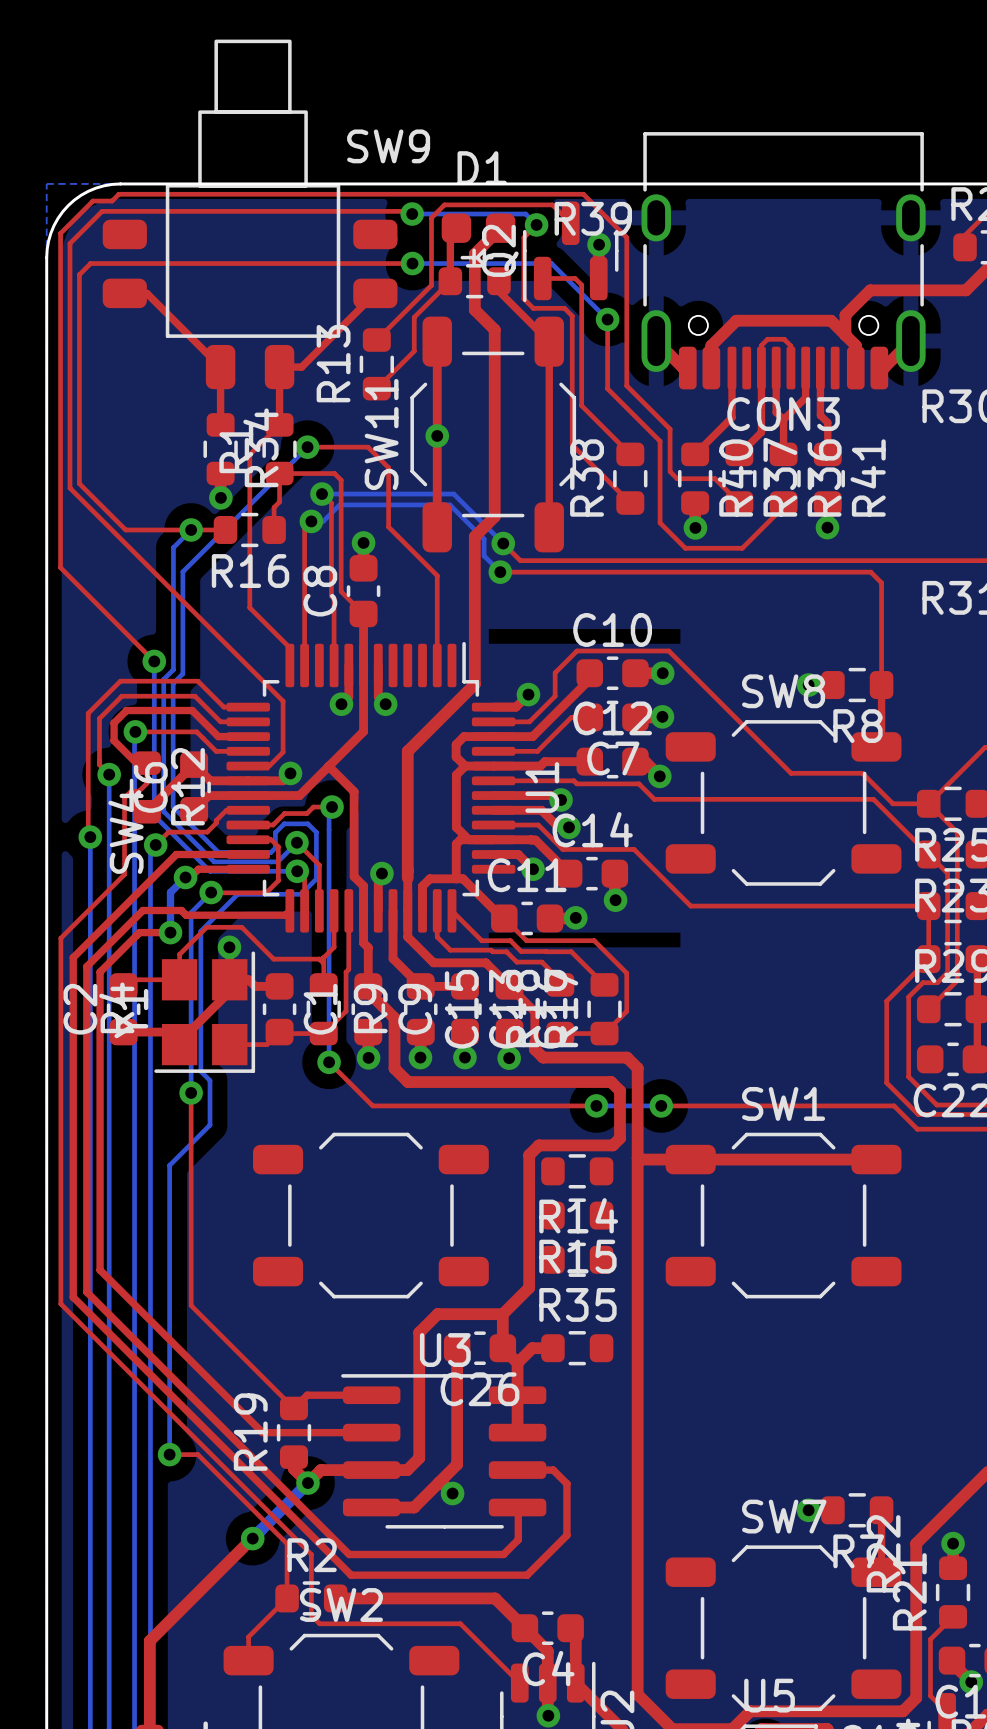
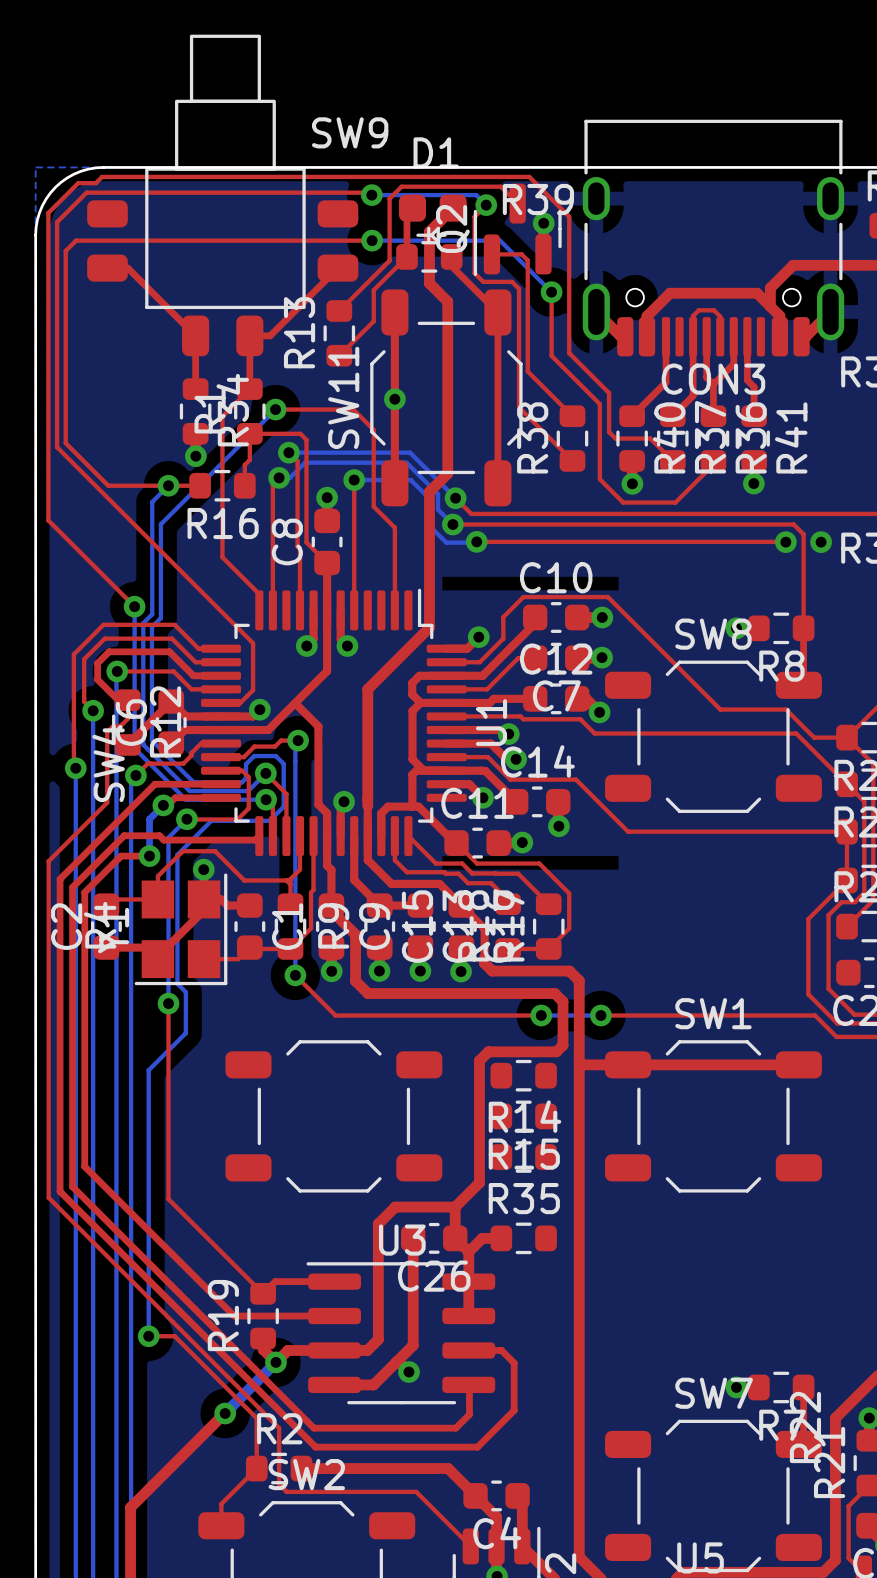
top track: (367, 447) (388, 467) (388, 527) (414, 552) -> (331, 409) (353, 409) (373, 429) (373, 506)
top track: none -> (354, 480) (354, 610)
bottom track: none -> (354, 480) (410, 480) (429, 498) (429, 525) (446, 542) (476, 541)
via: none -> (354, 480)
top track: none -> (476, 541) (785, 541)
via: none -> (476, 541)
via: none -> (785, 542)
via: none -> (821, 542)

